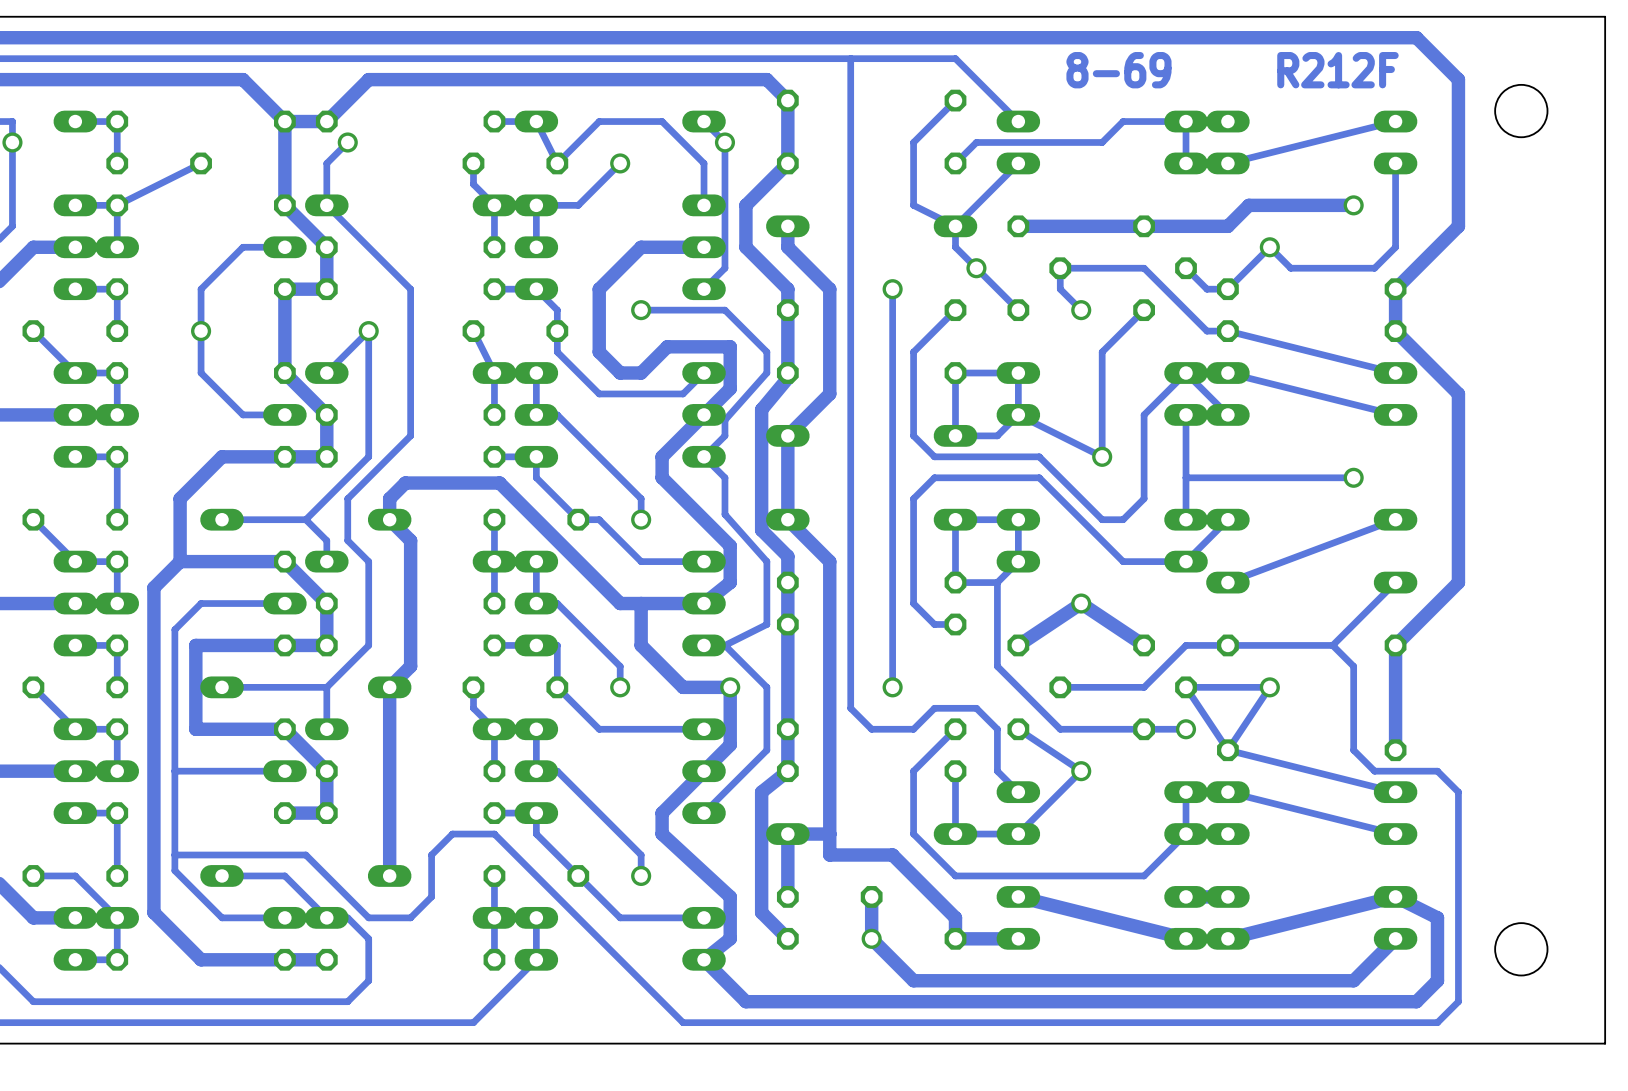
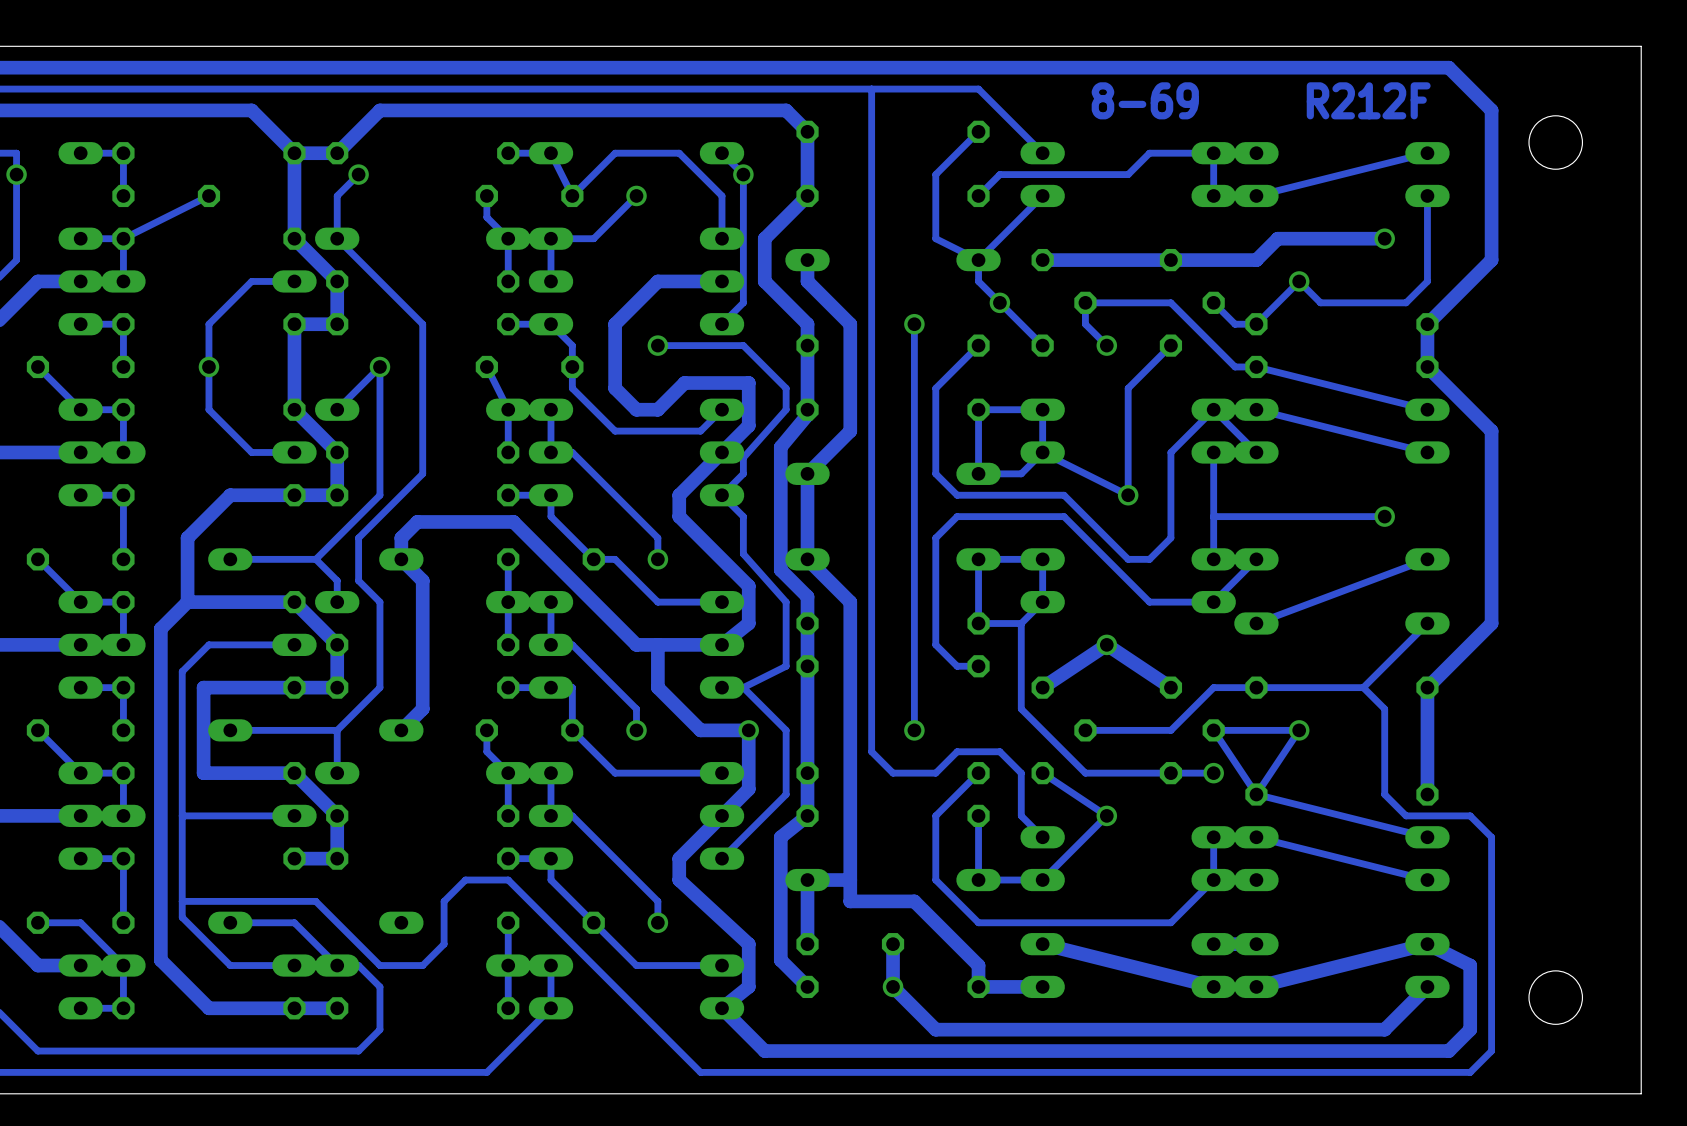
track: (389, 687) (389, 875) -> none

